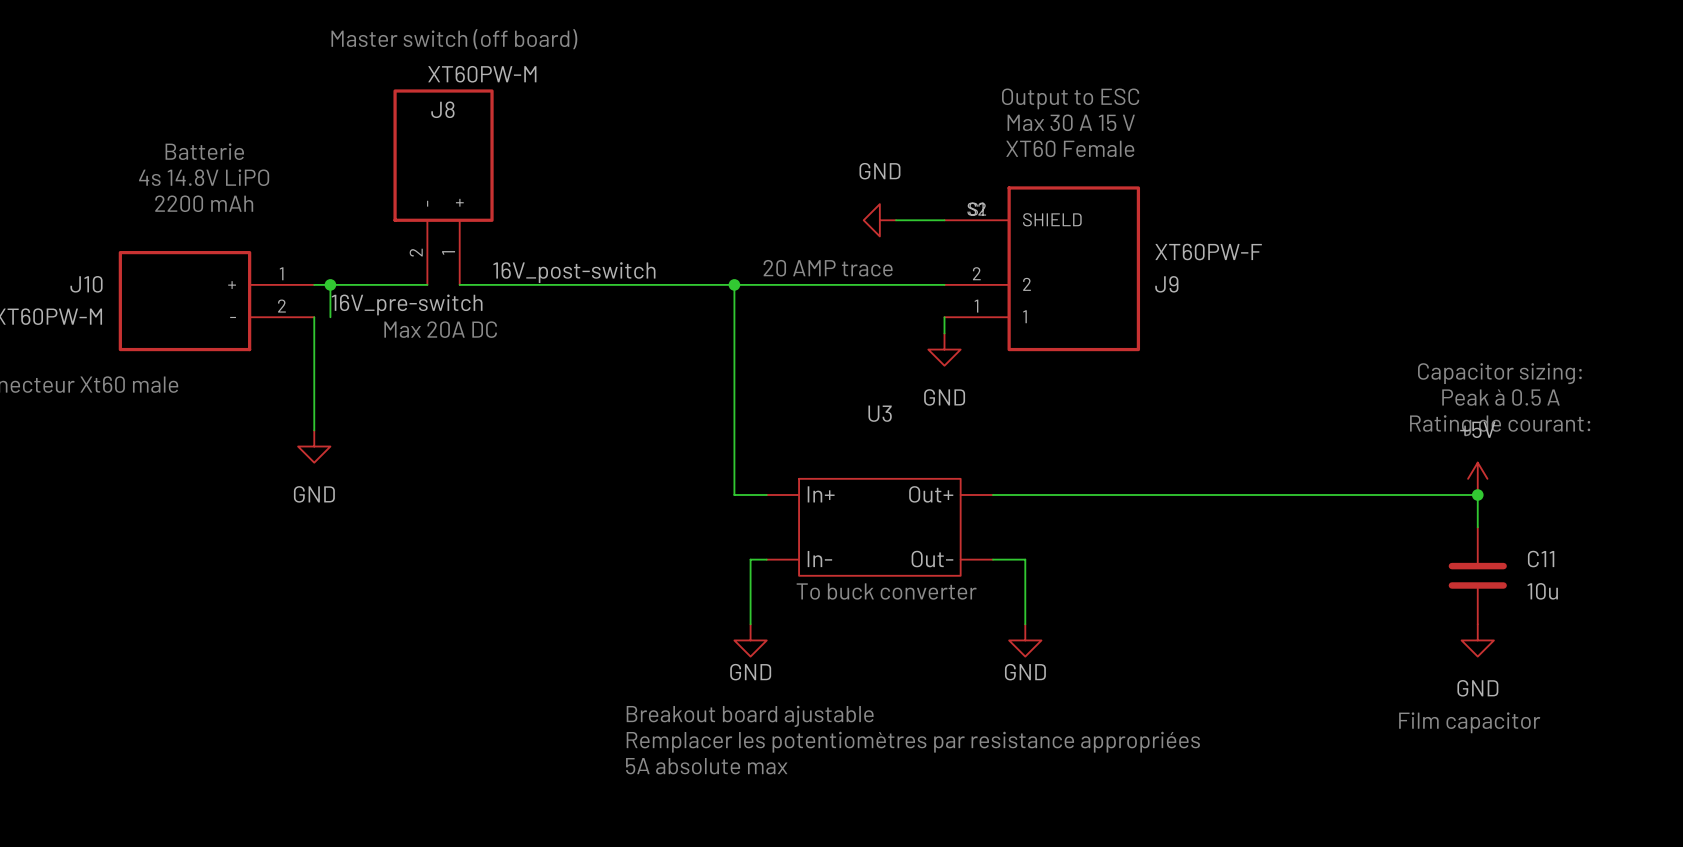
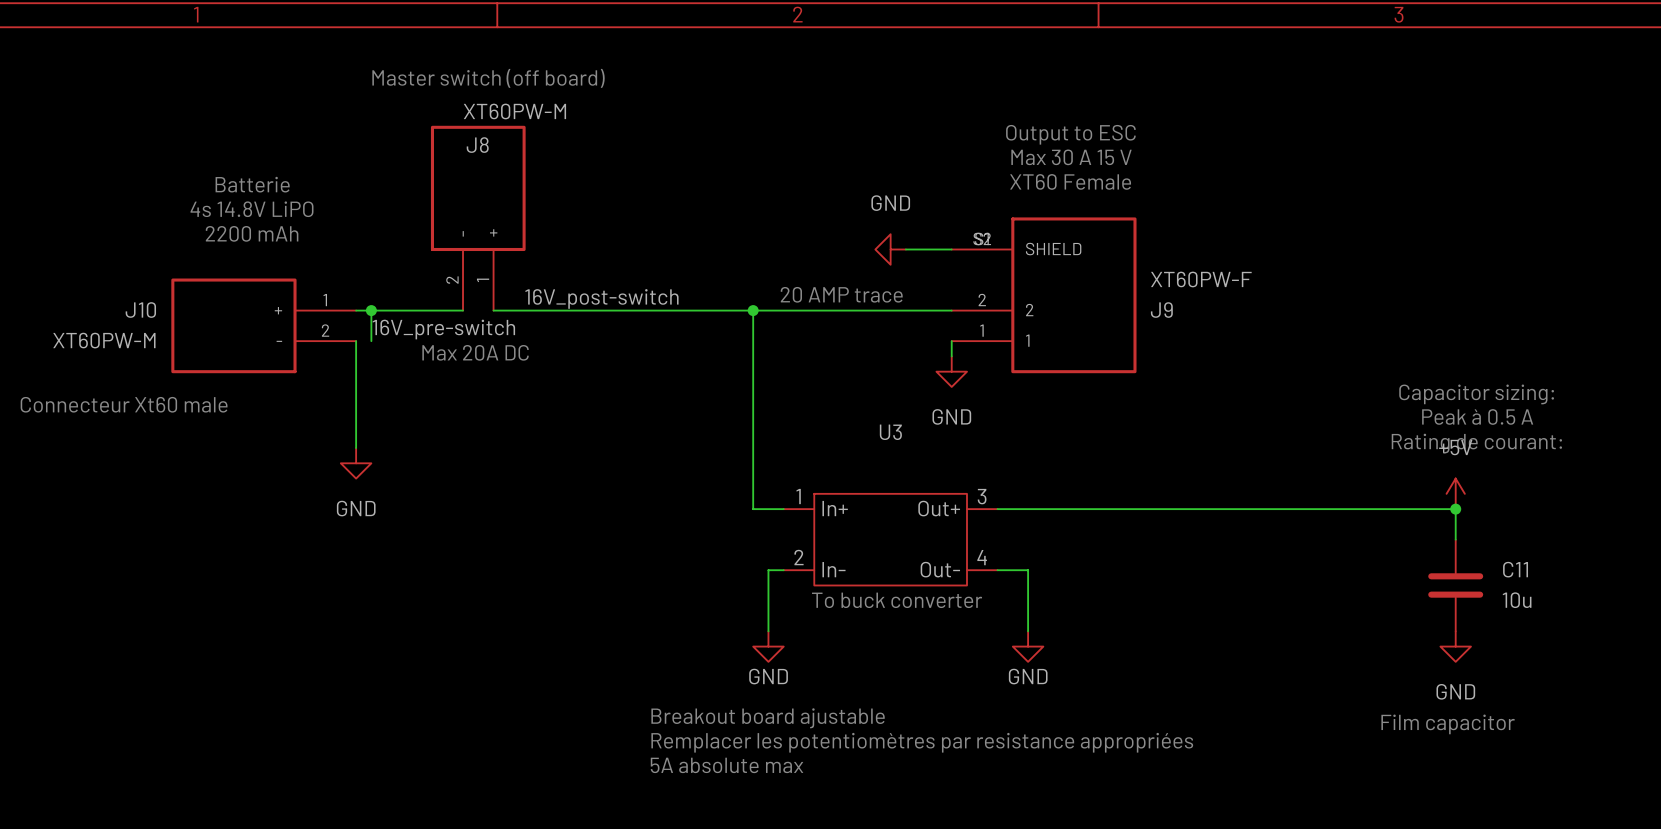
U3 pin number: none -> 1 (798, 496)
U3 pin number: none -> 3 (982, 496)
U3 pin number: none -> 2 (798, 557)
U3 pin number: none -> 4 (982, 557)

